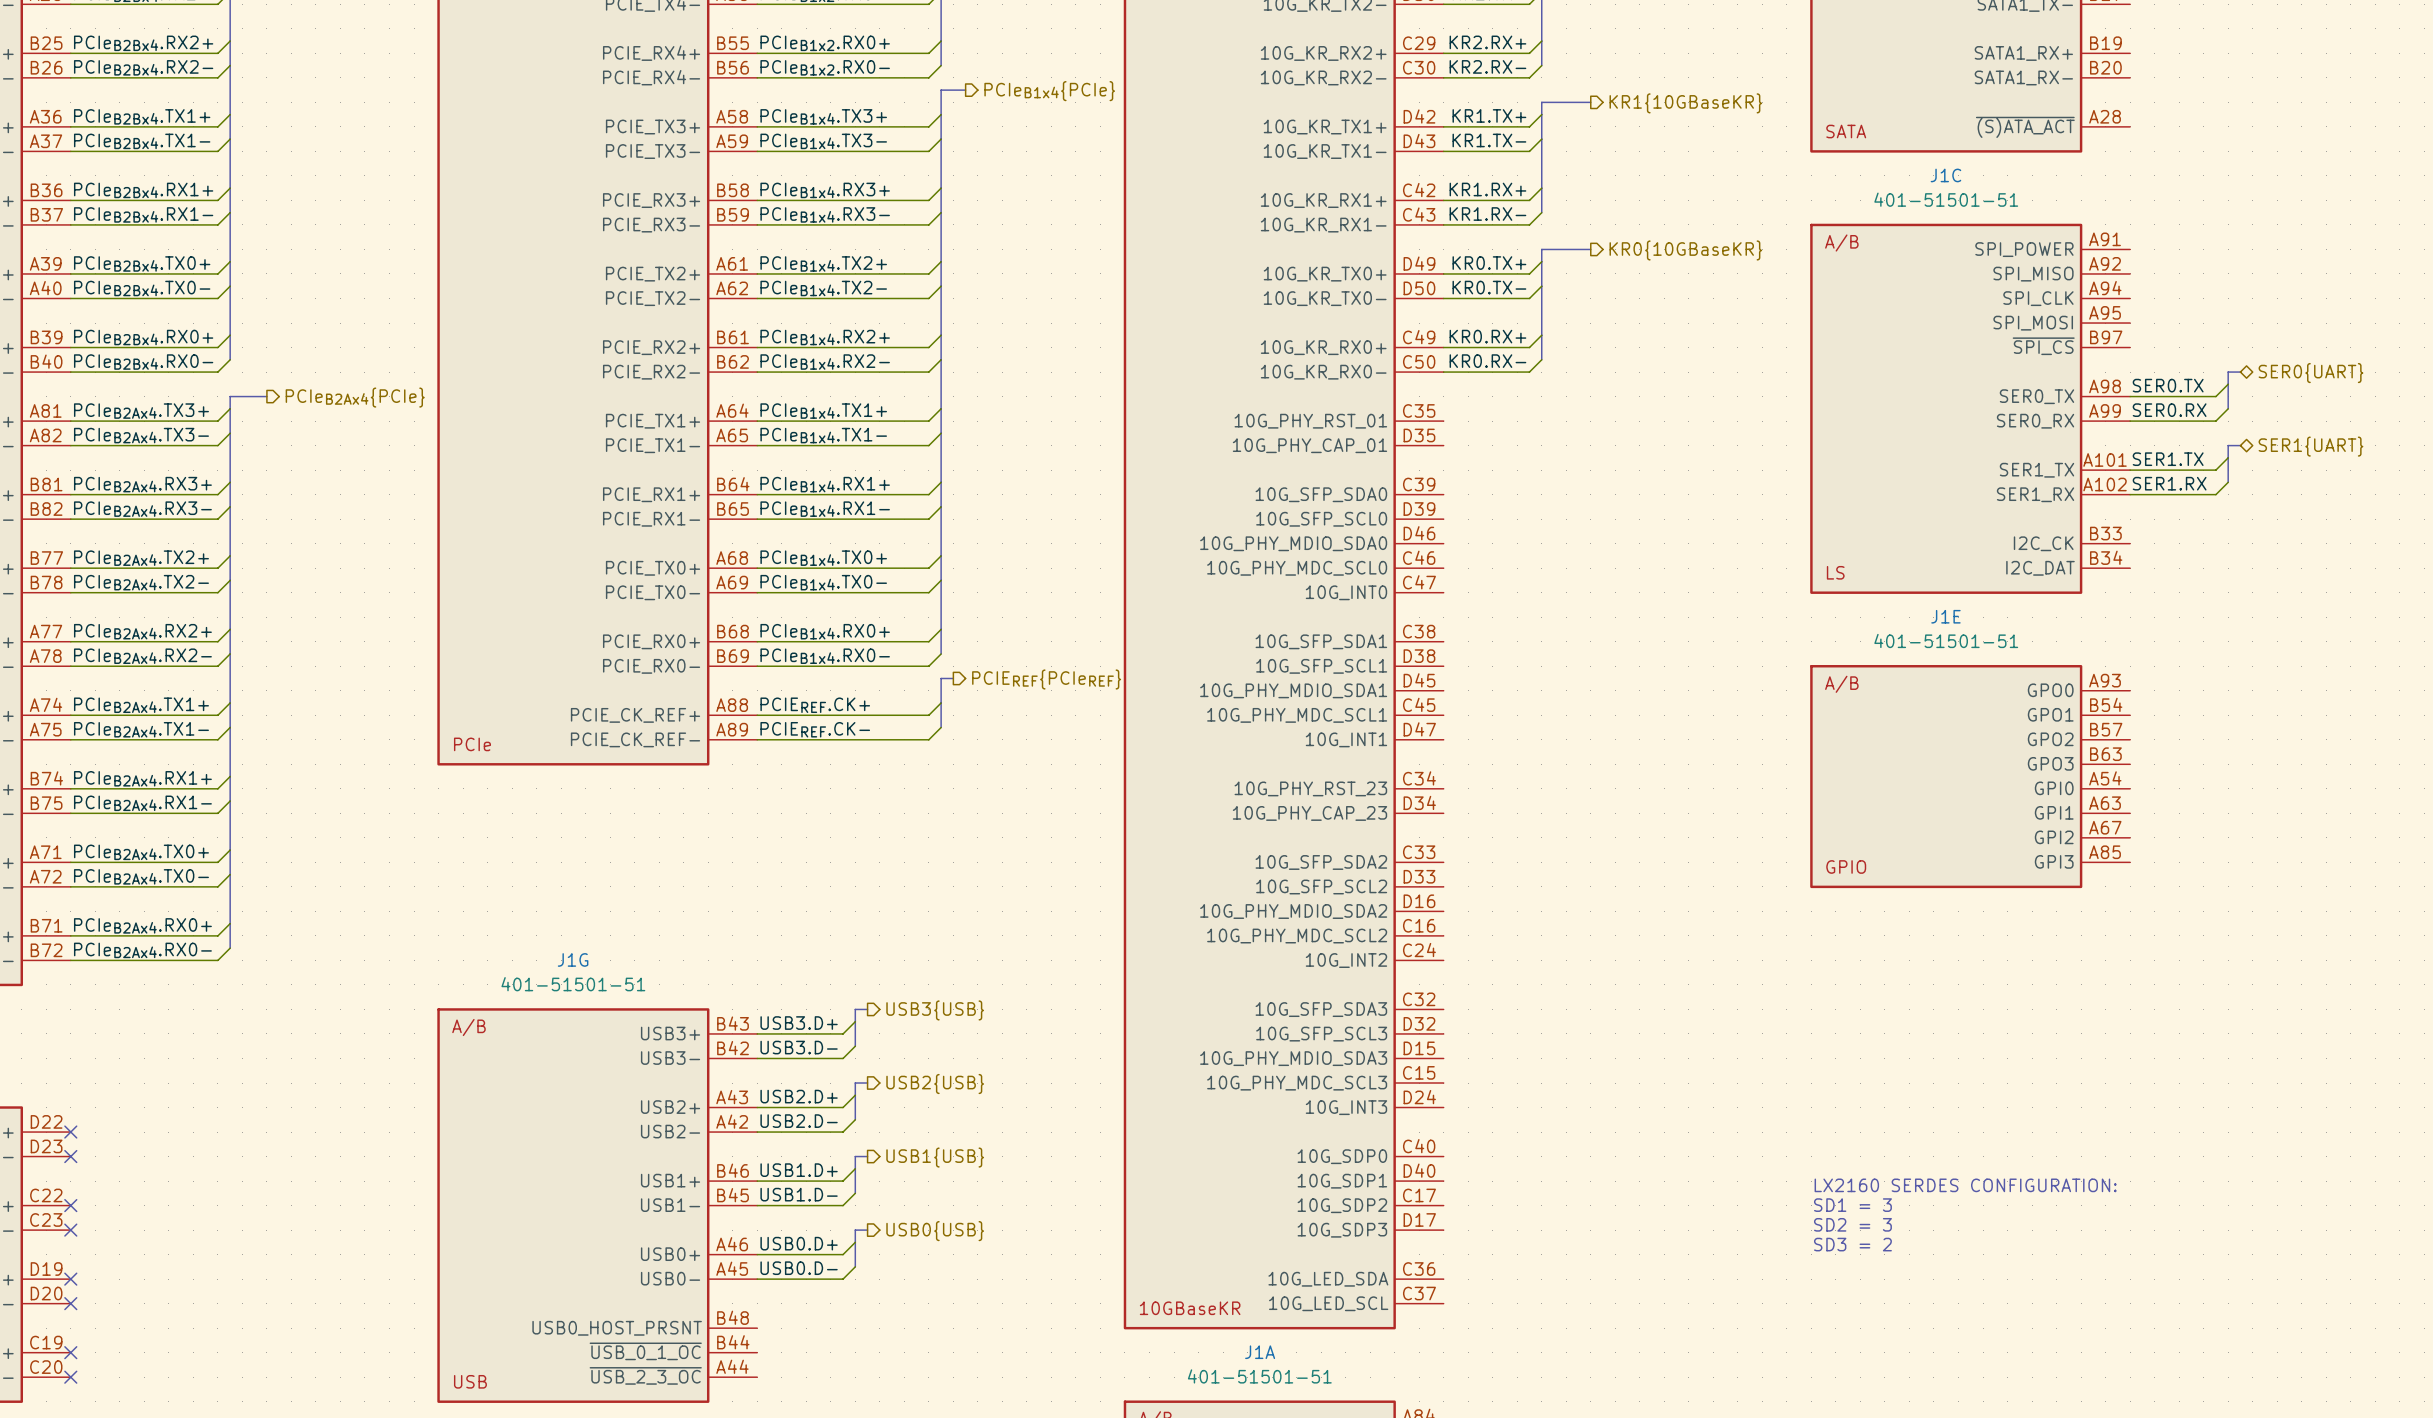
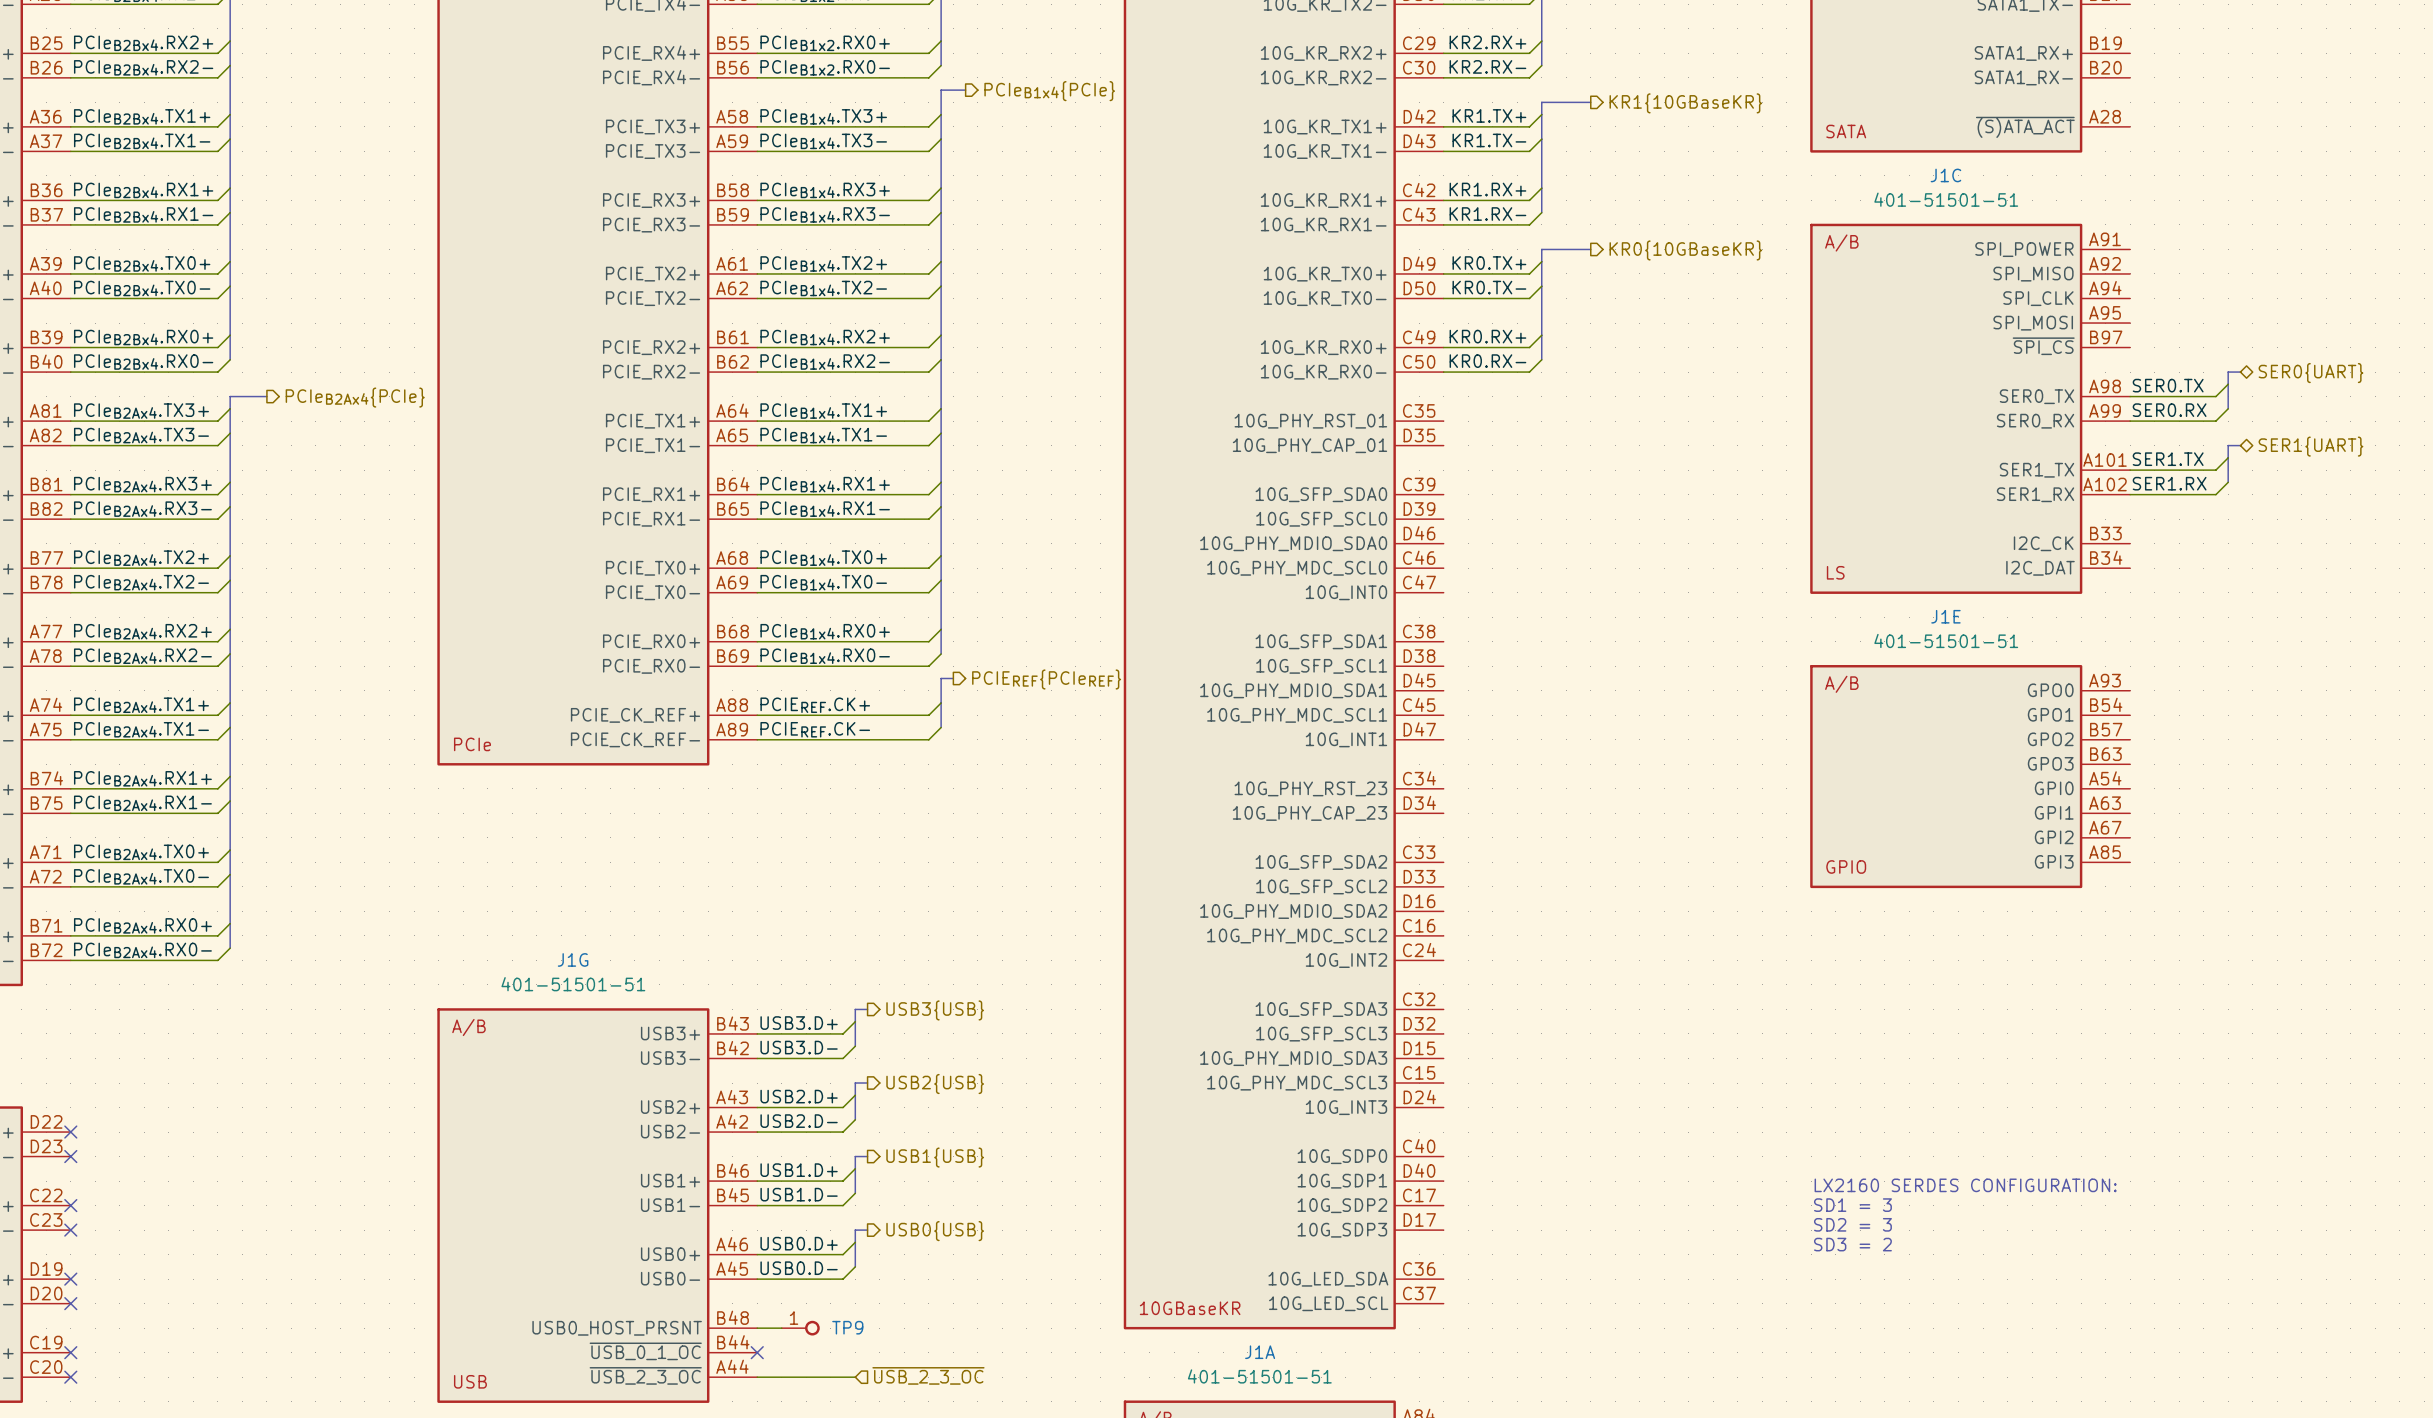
wire: none -> (757, 1328) (781, 1328)
TP9: none -> (800, 1328)
no-connect mark: none -> (757, 1352)
hierarchical label: none -> ~{USB_2_3_OC} (928, 1375)
wire: none -> (757, 1377) (855, 1377)

